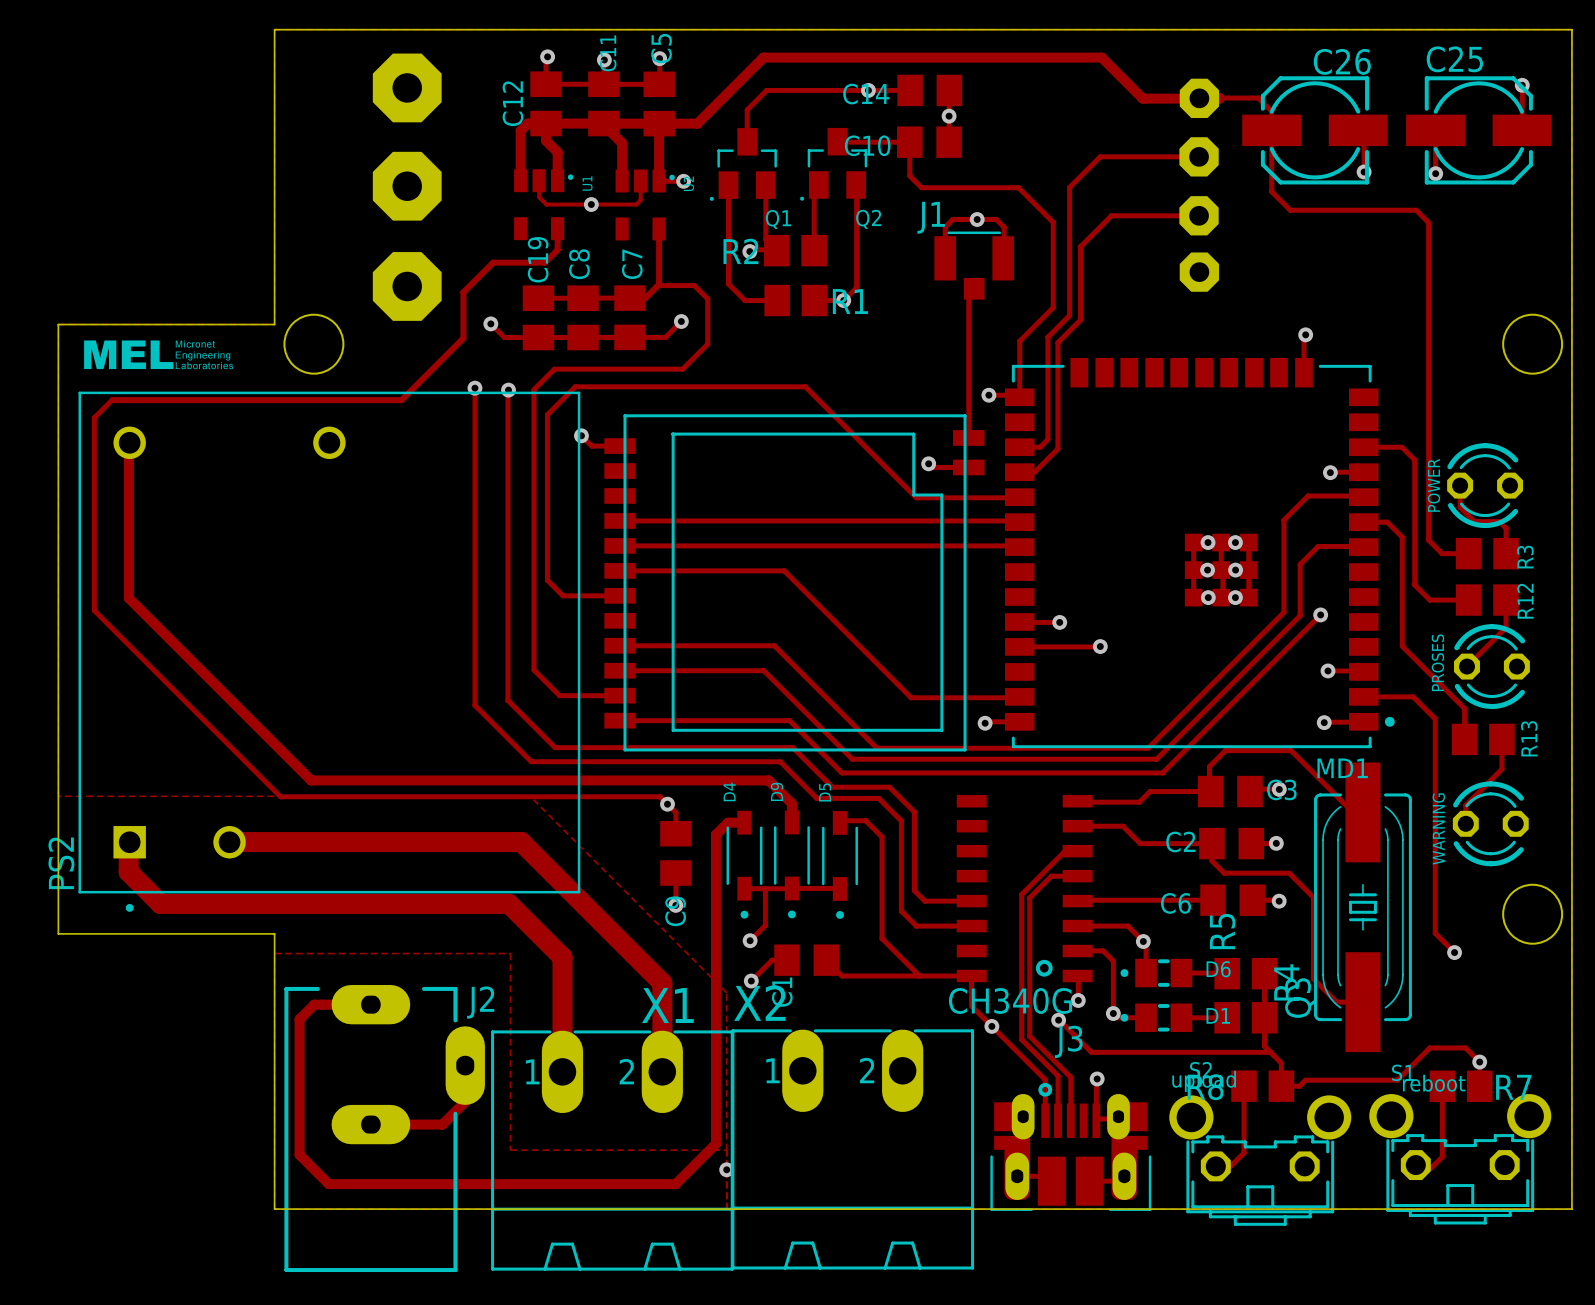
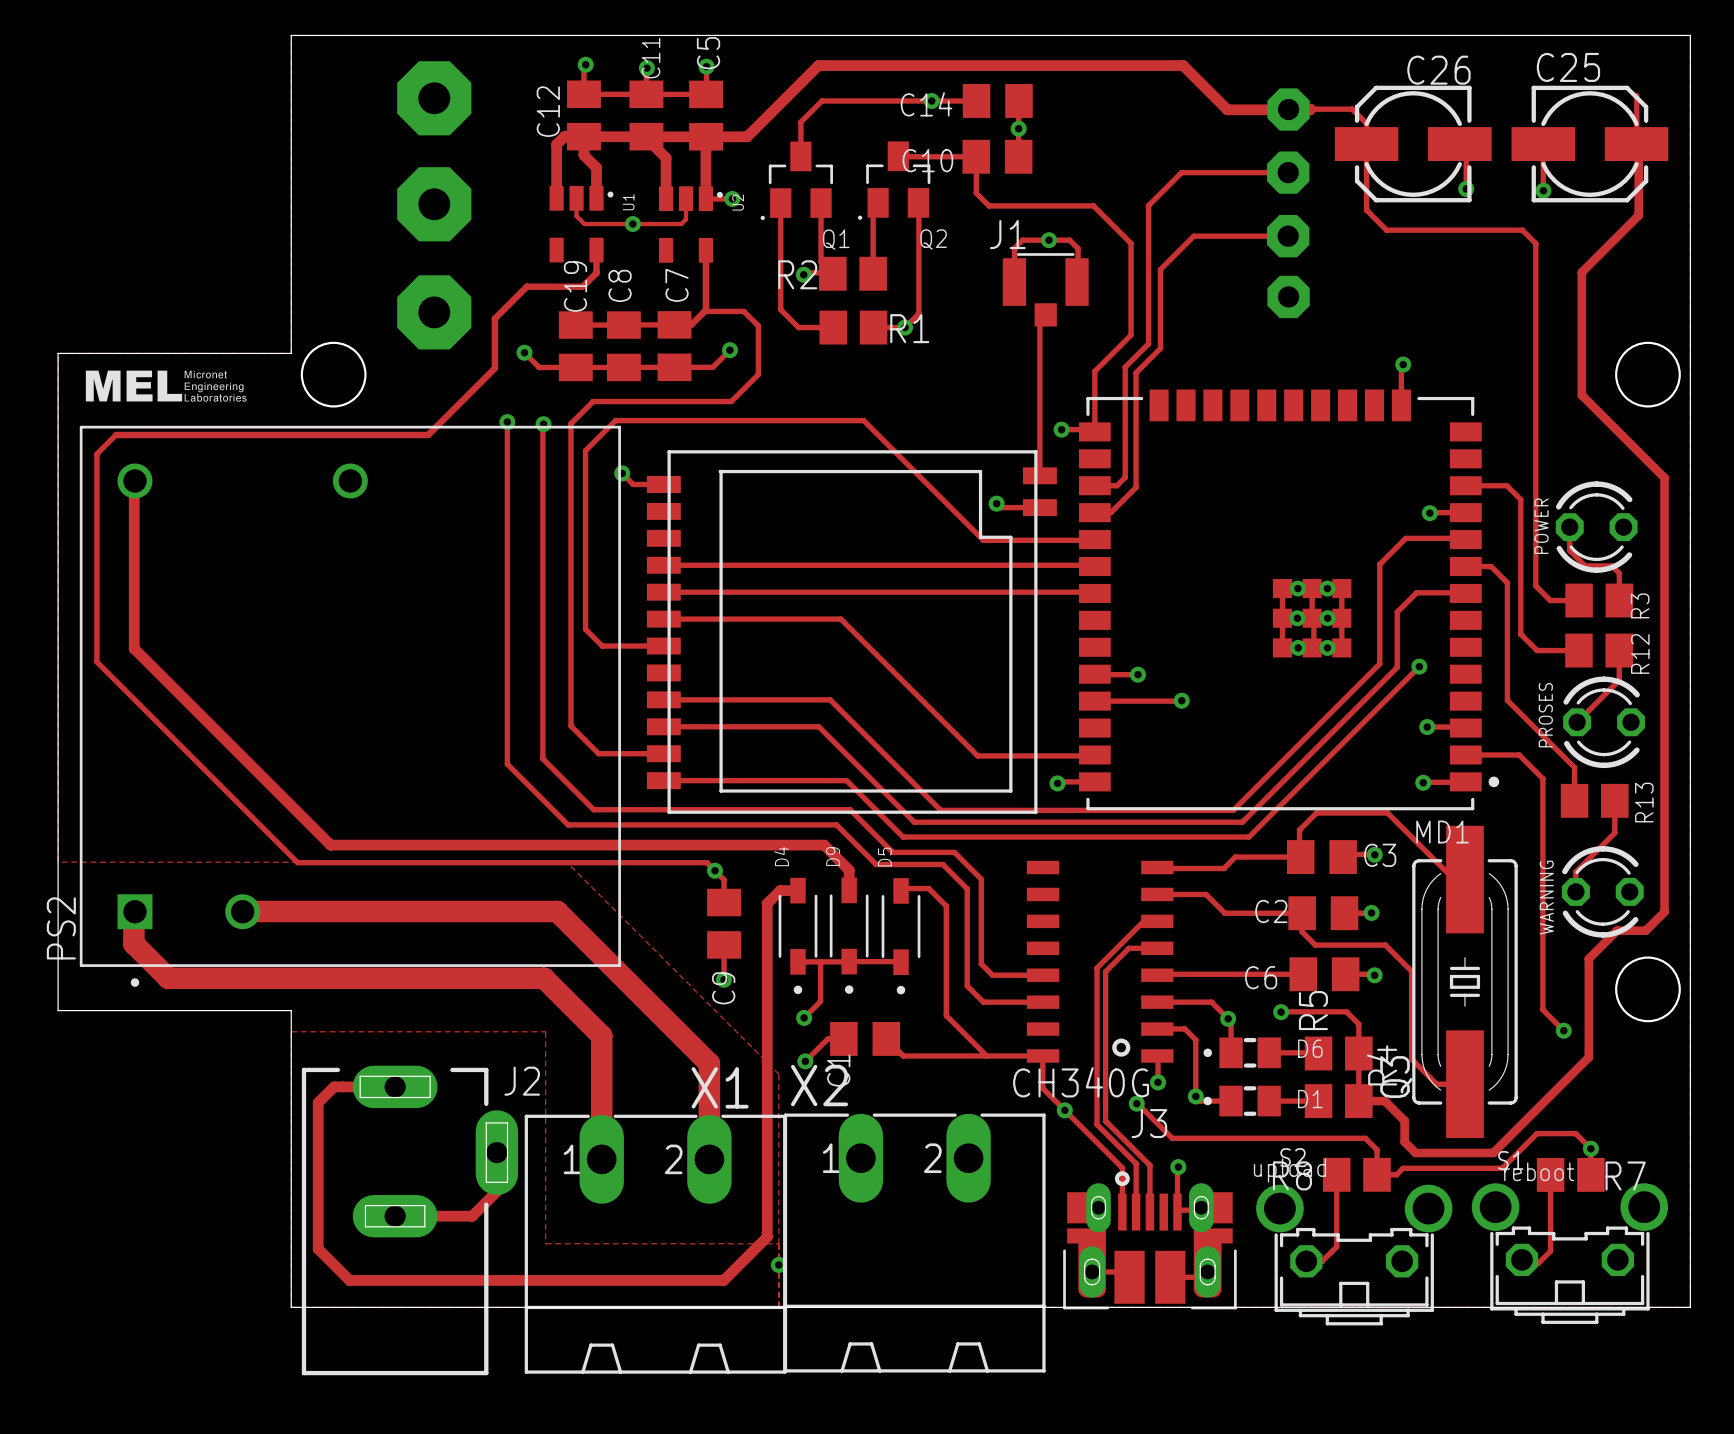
via: (1522, 85) -> none
track: none -> (1281, 1012) (1346, 1011) (1358, 1024) (1358, 1053)
via: none -> (1281, 1012)
track: (1264, 1017) (1264, 1046) (1270, 1052) -> (1358, 1101) (1384, 1101) (1404, 1120) (1404, 1142) (1415, 1152) (1493, 1152) (1588, 1057) (1588, 958) (1616, 930) (1645, 930) (1664, 911) (1664, 477) (1581, 395) (1581, 272) (1638, 215) (1638, 146)

